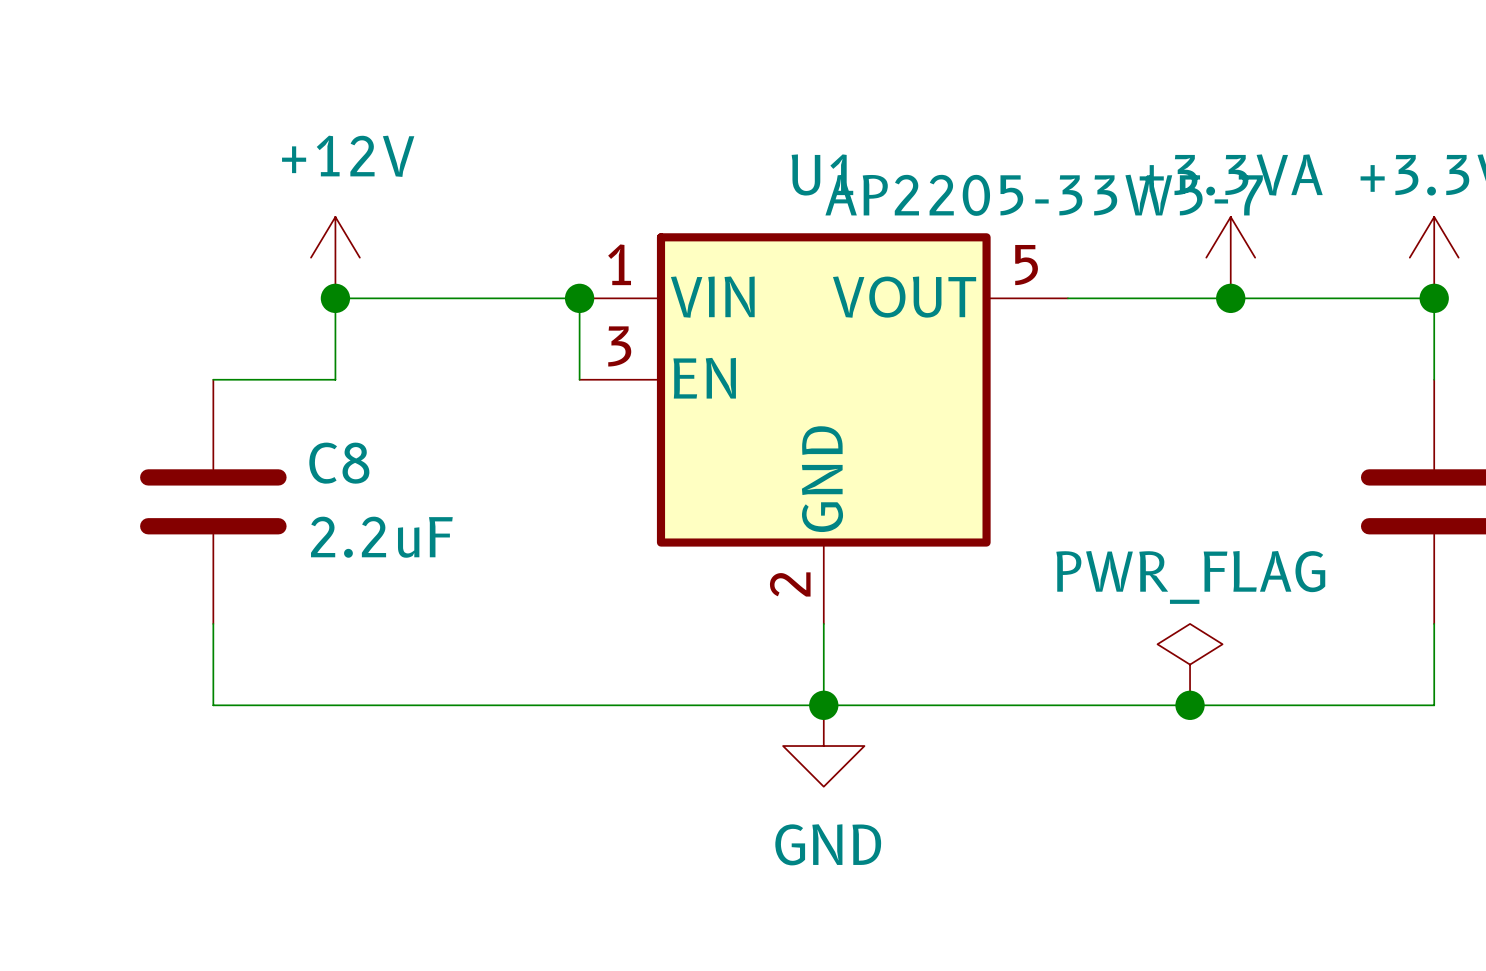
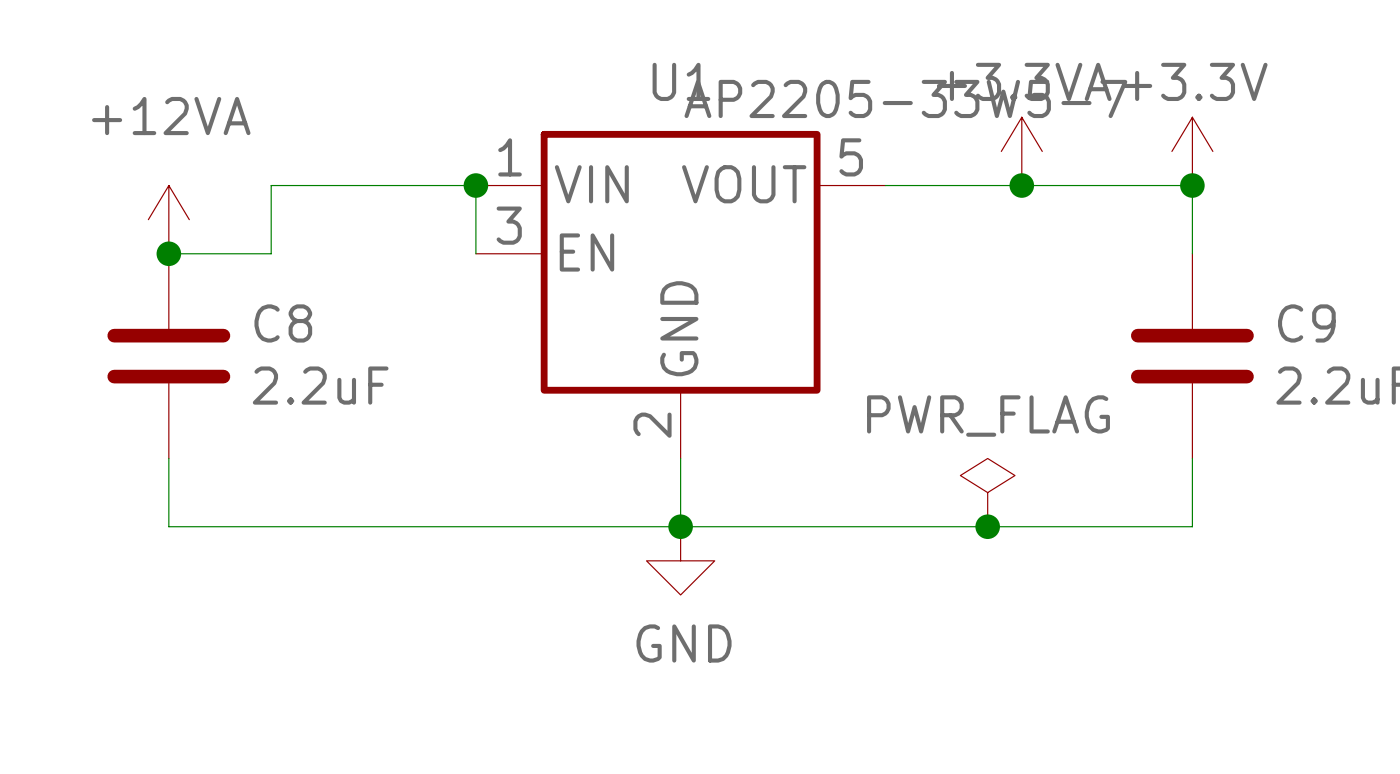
power symbol: +12V (335, 257) -> none
junction position: (335, 298) -> (168, 253)
power symbol: none -> +12VA (168, 219)

